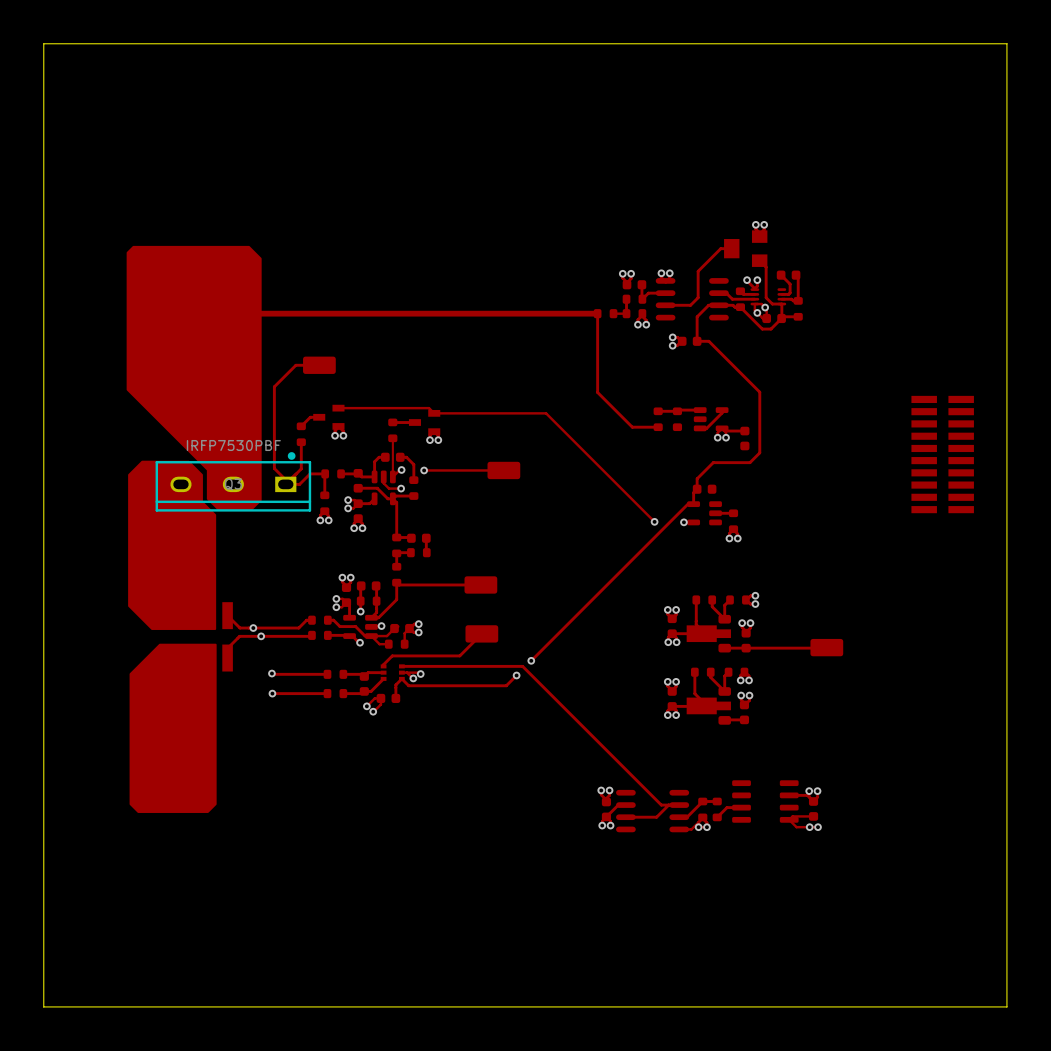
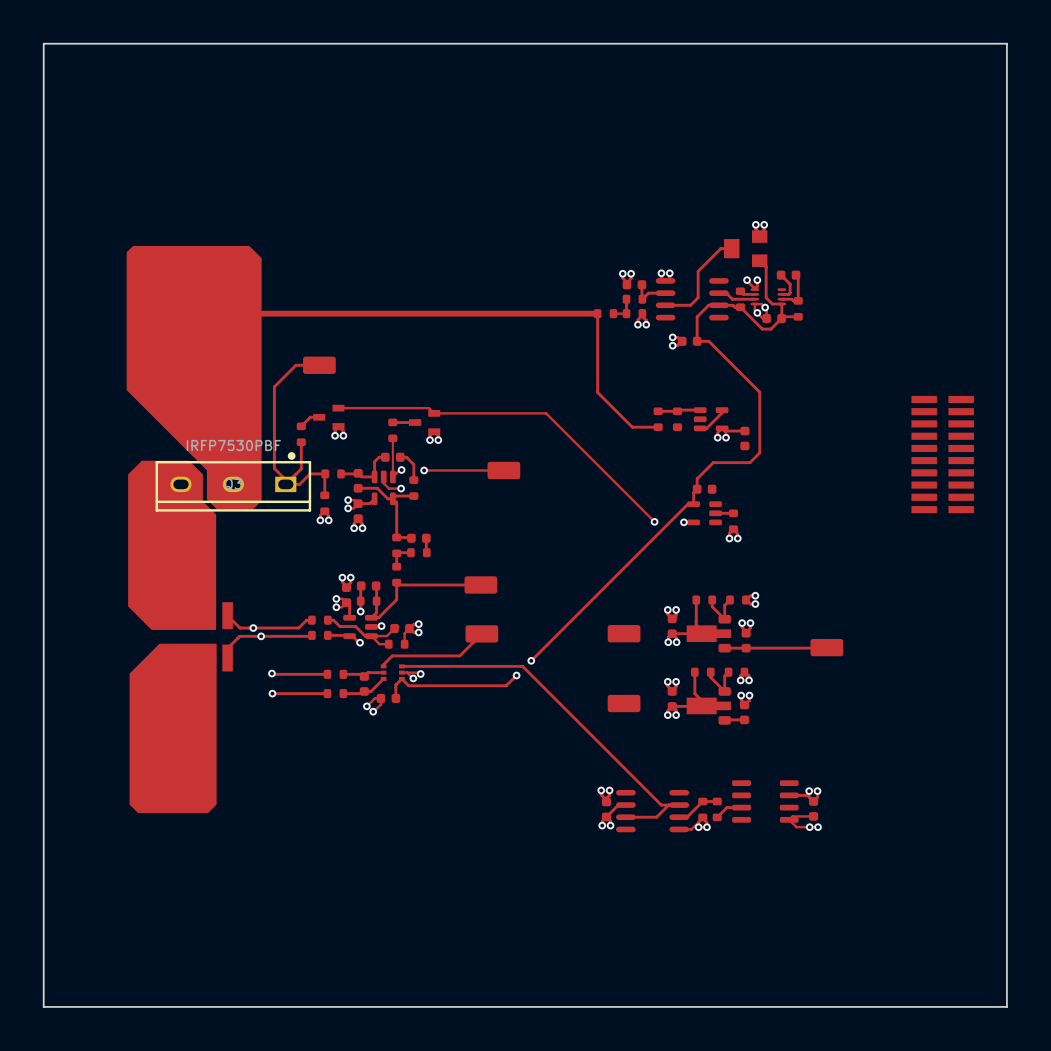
part: none -> (624, 633)
part: none -> (624, 703)

